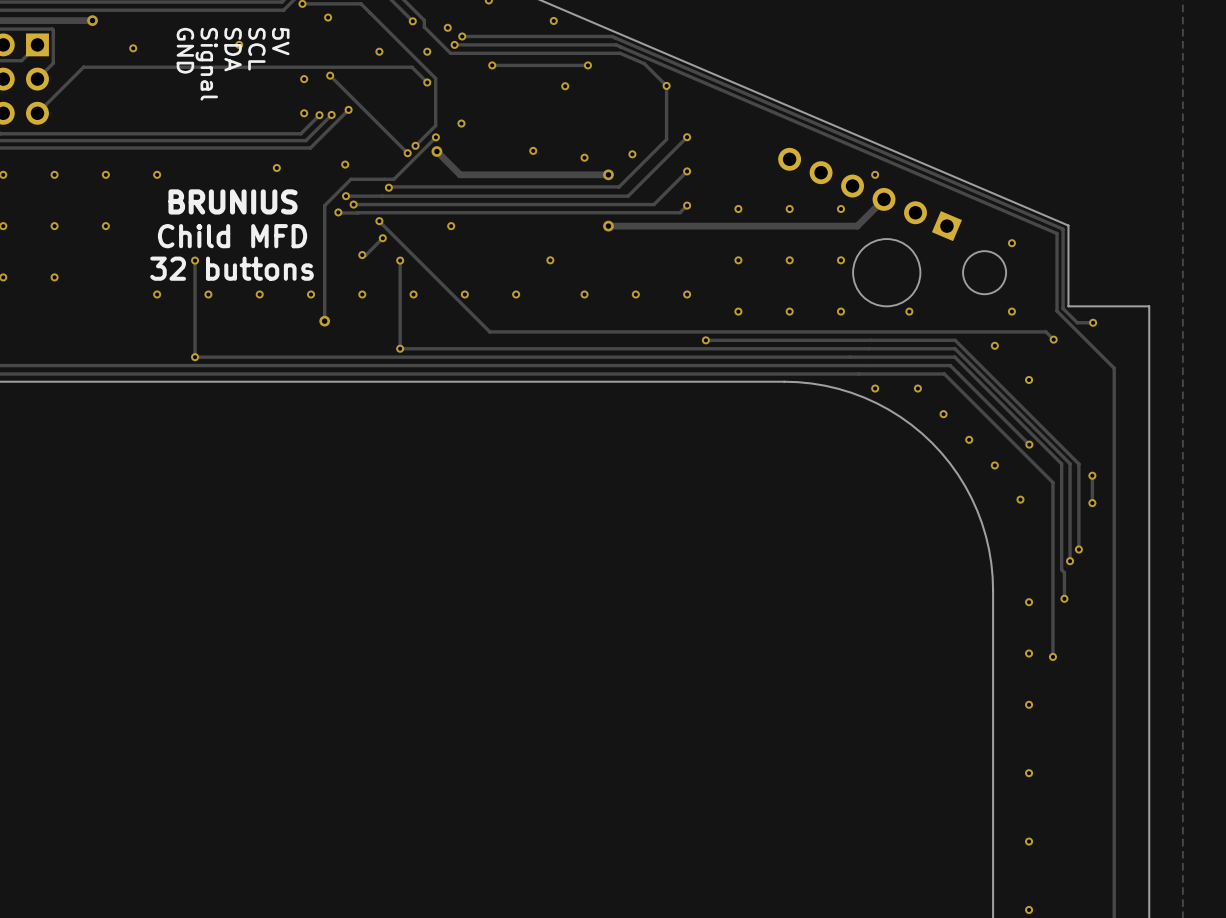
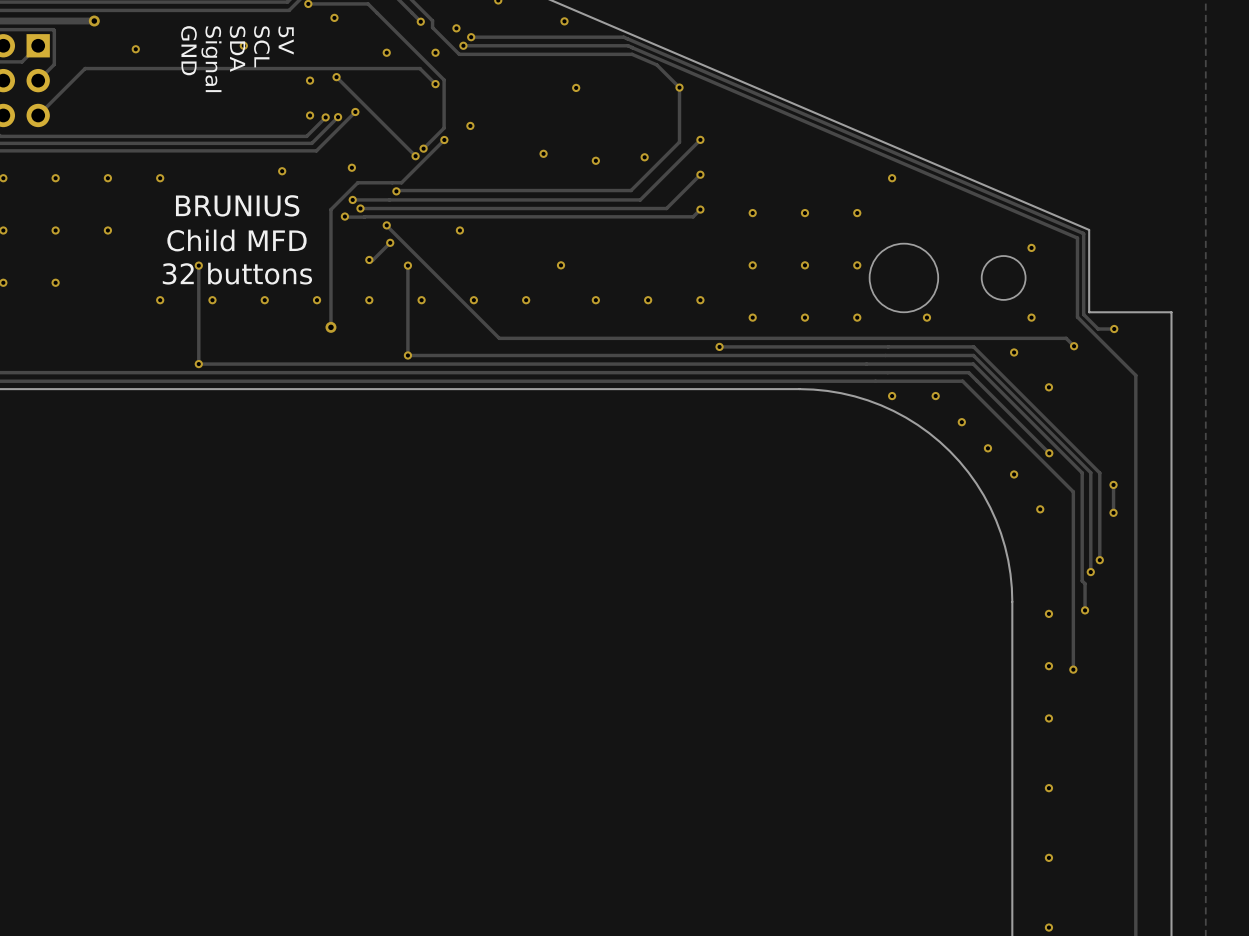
via: (492, 65) -> none
track: (587, 65) (492, 65) -> none
via: (587, 65) -> none
track: (436, 151) (460, 174) (608, 174) -> none
via: (436, 151) -> none
via: (608, 174) -> none
part: (870, 194) -> none
track: (884, 199) (857, 226) (608, 226) -> none
via: (608, 226) -> none

